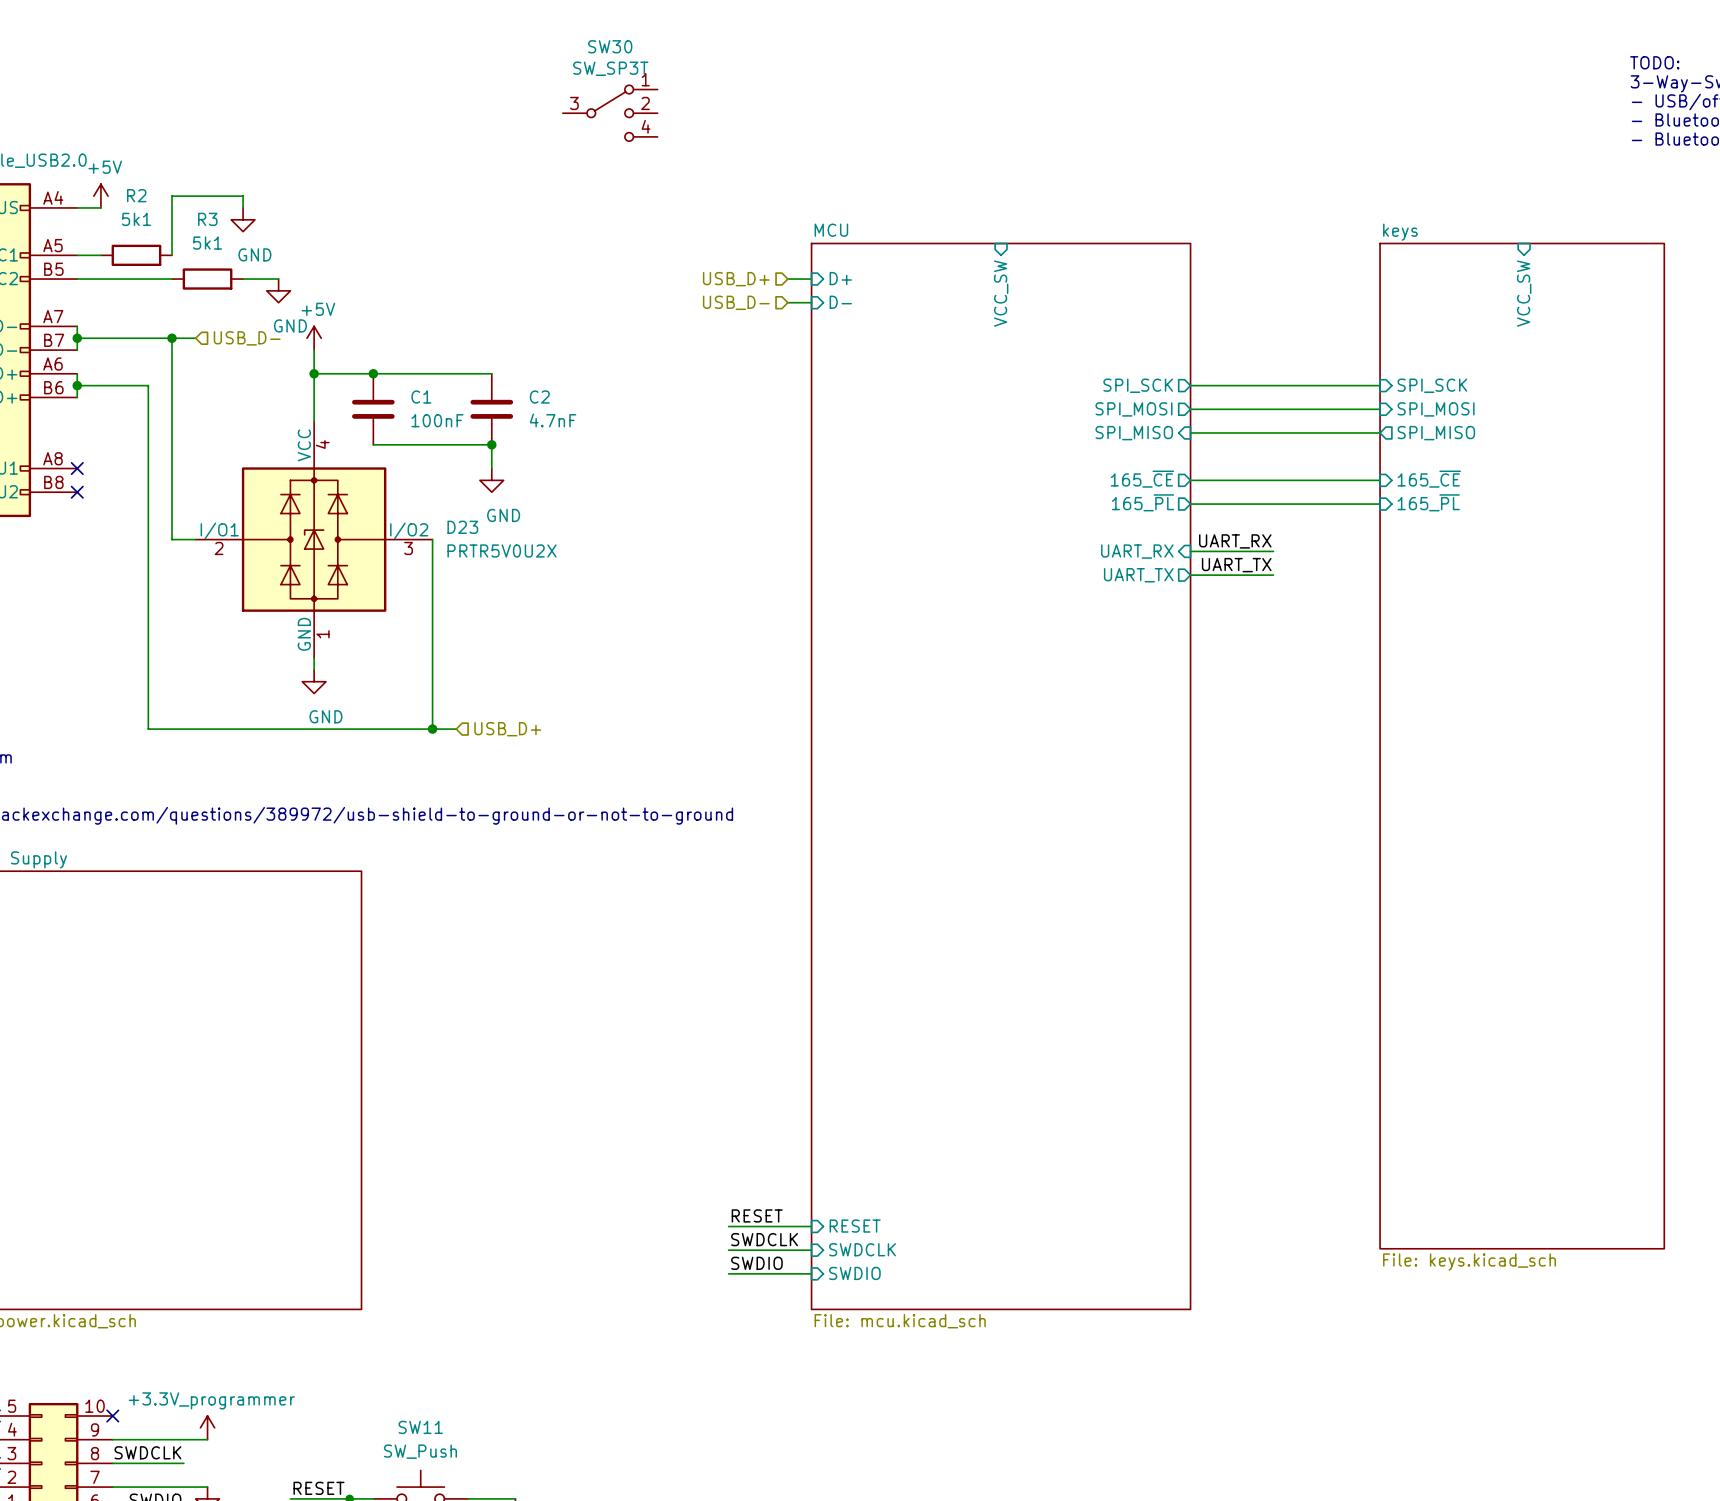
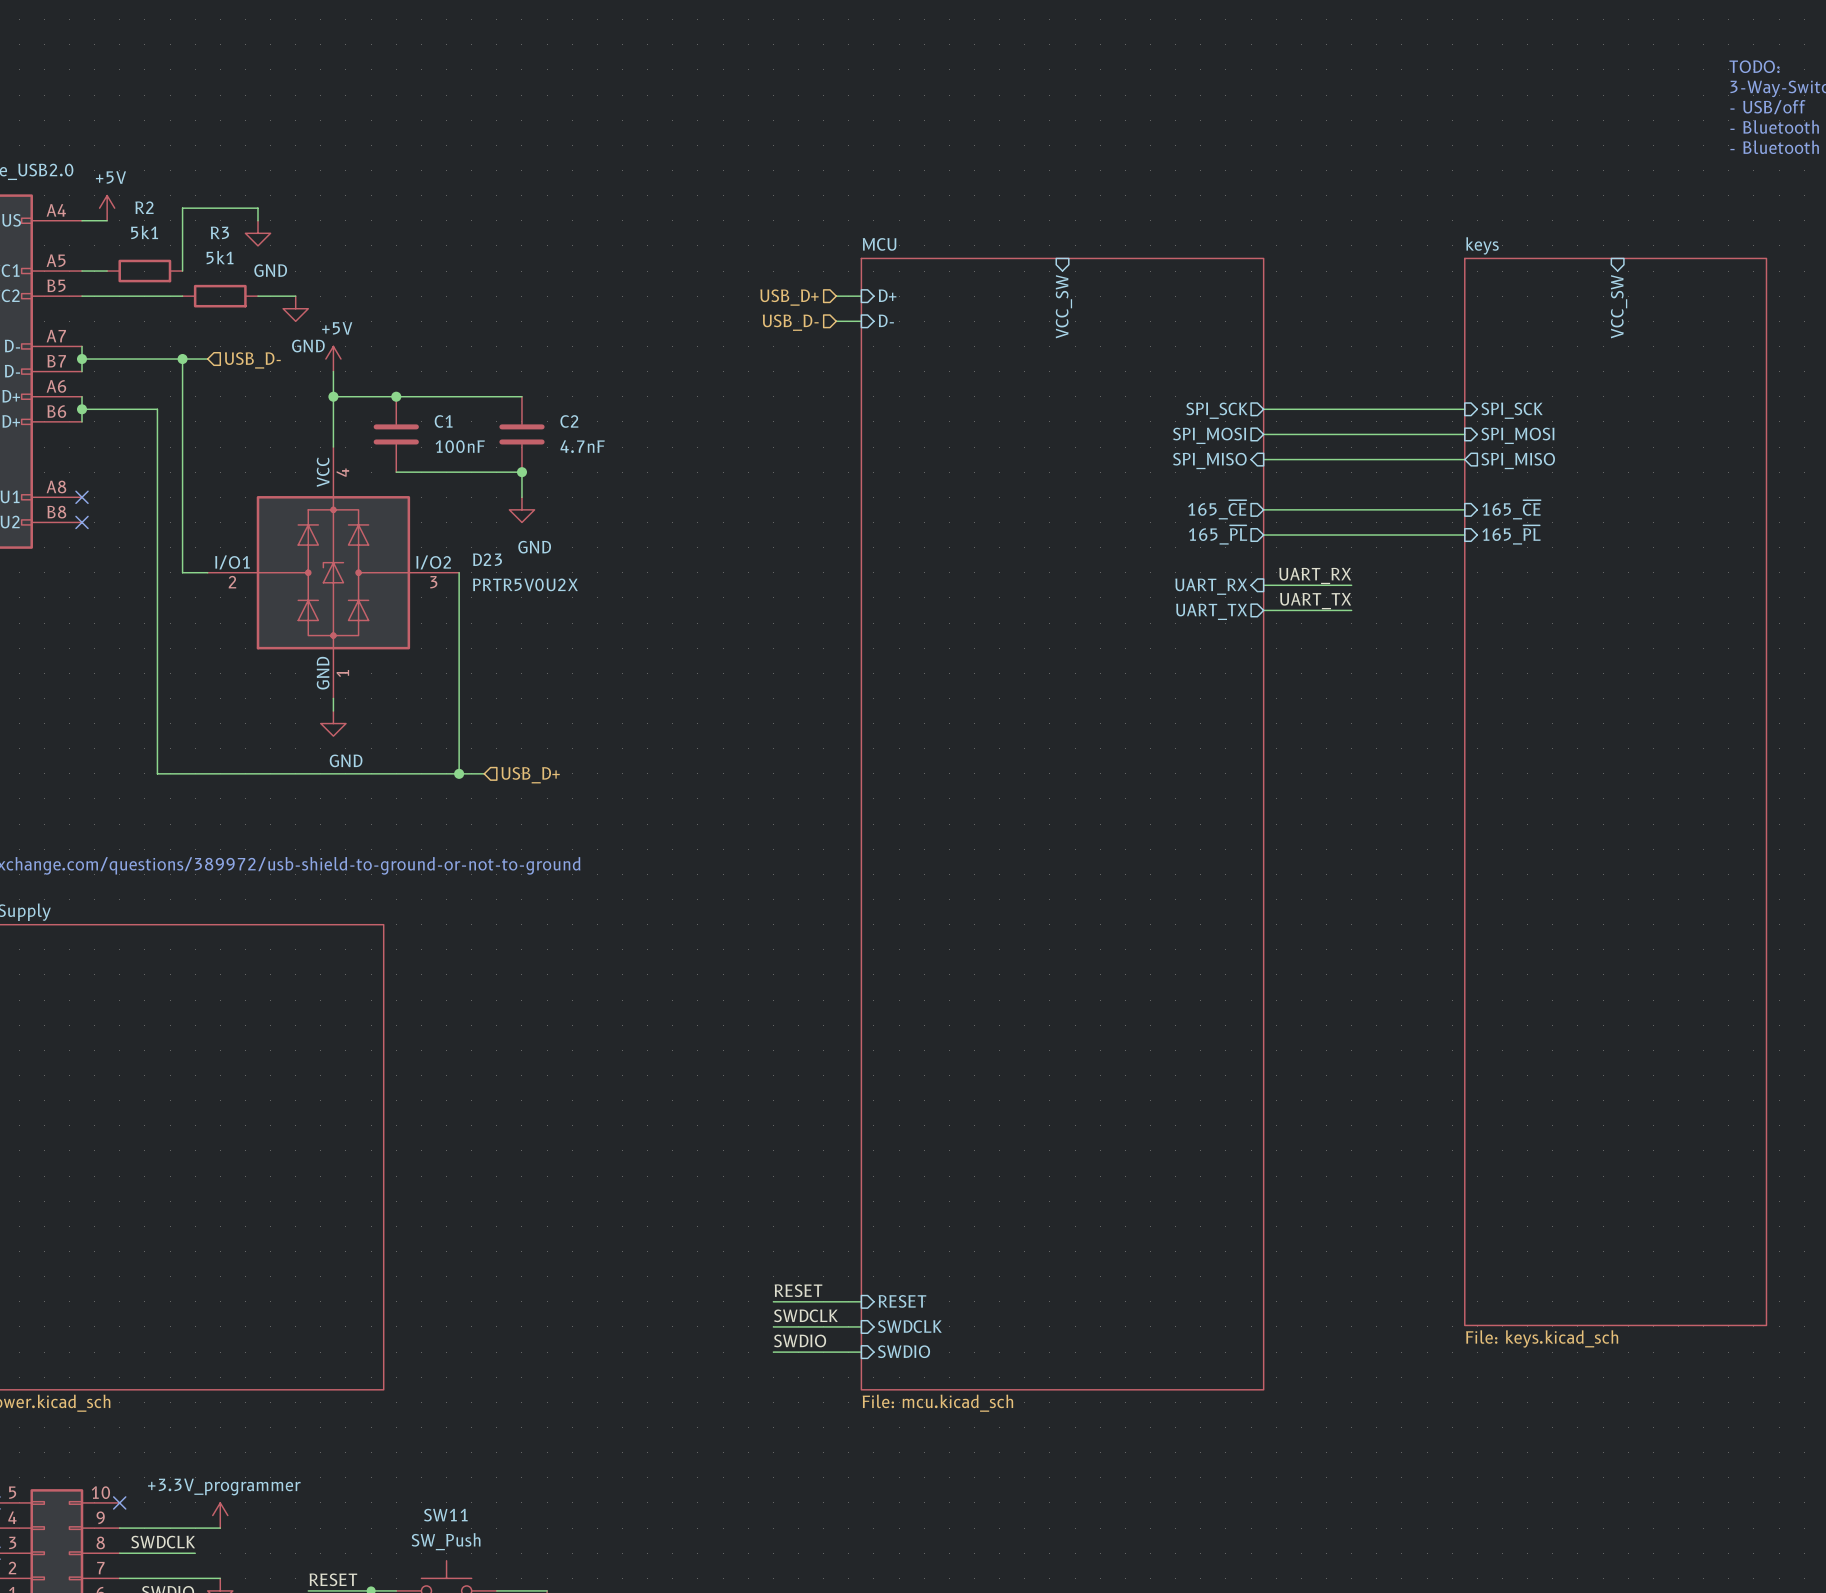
SW30: SW_SP3T (610, 113) -> none

